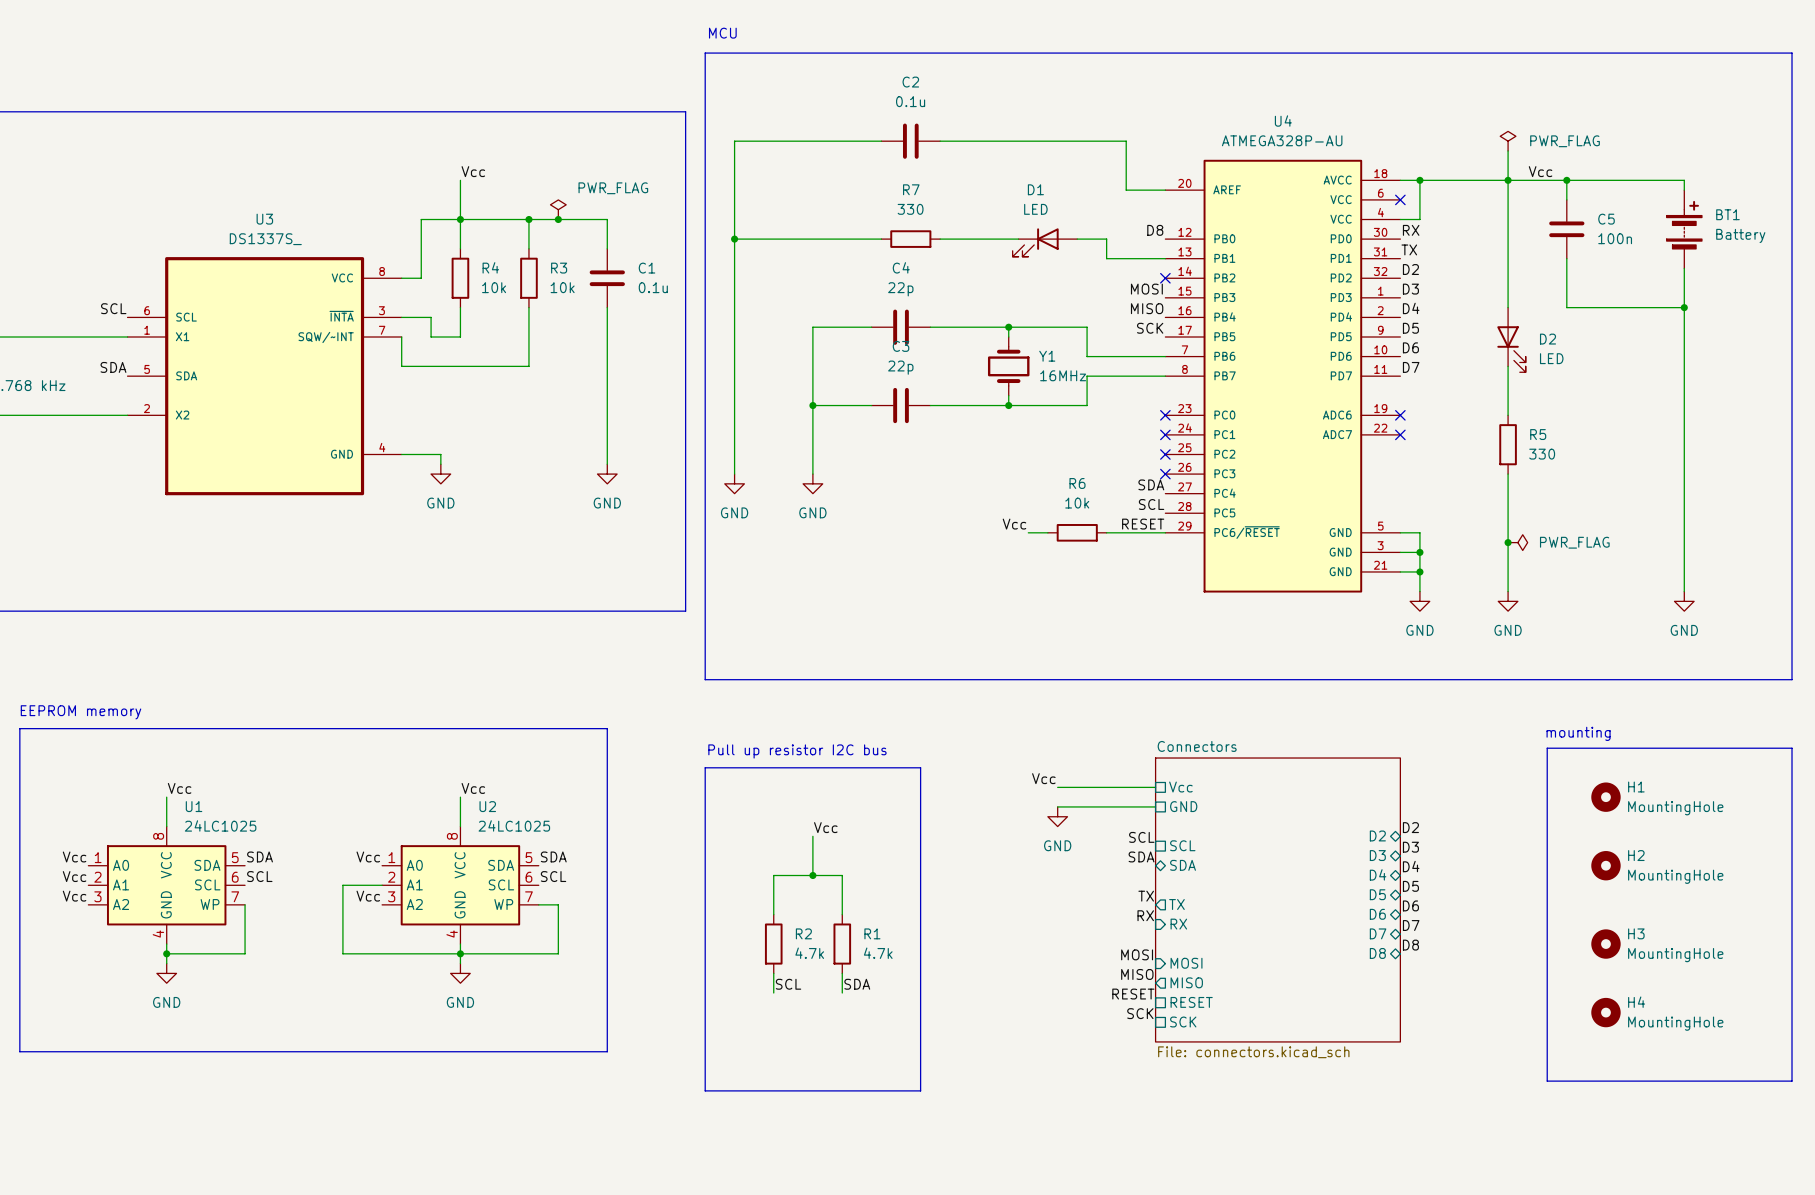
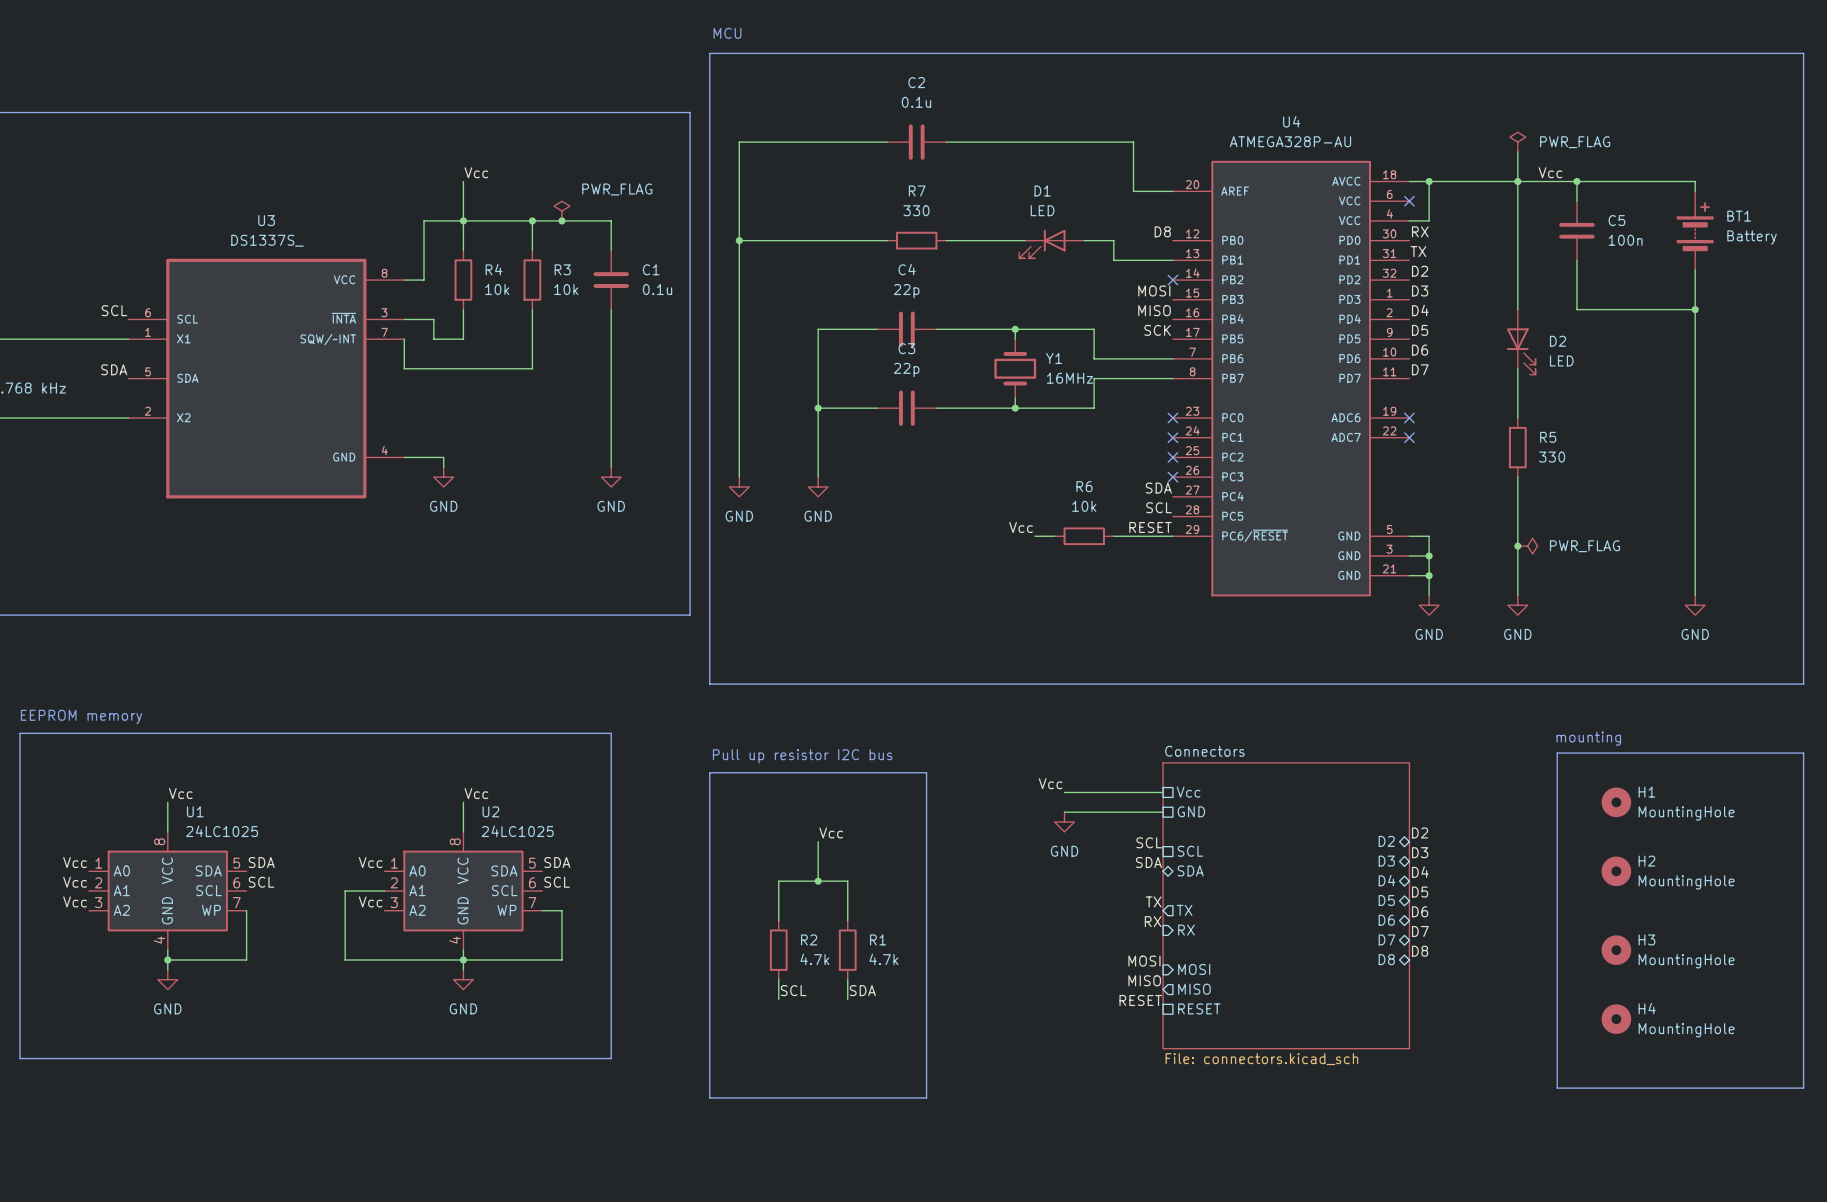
label: SCK (1140, 1013) -> none
sheet pin: SCK (1183, 1022) -> none

